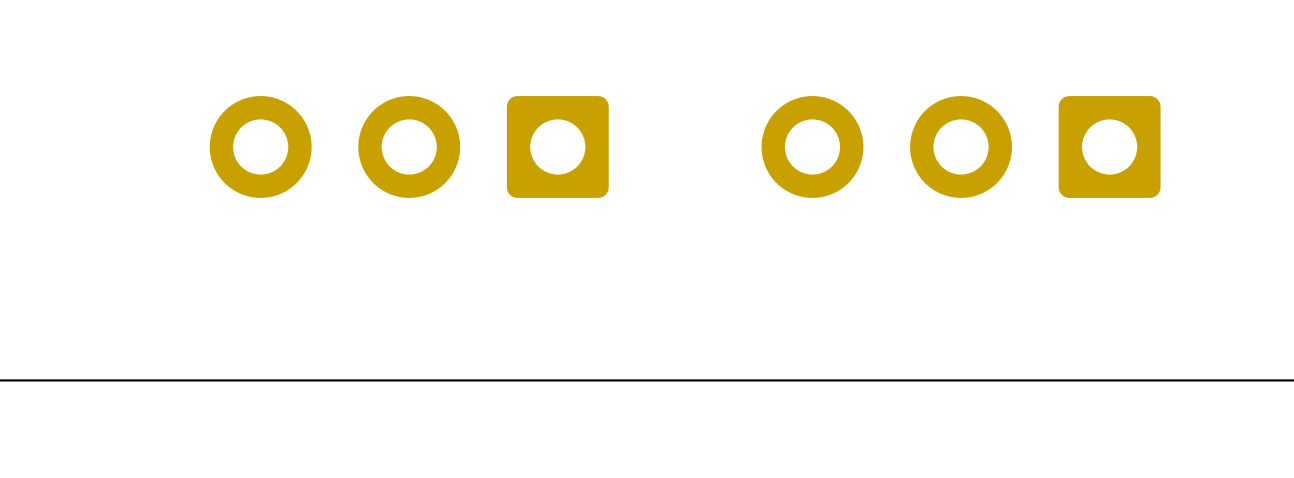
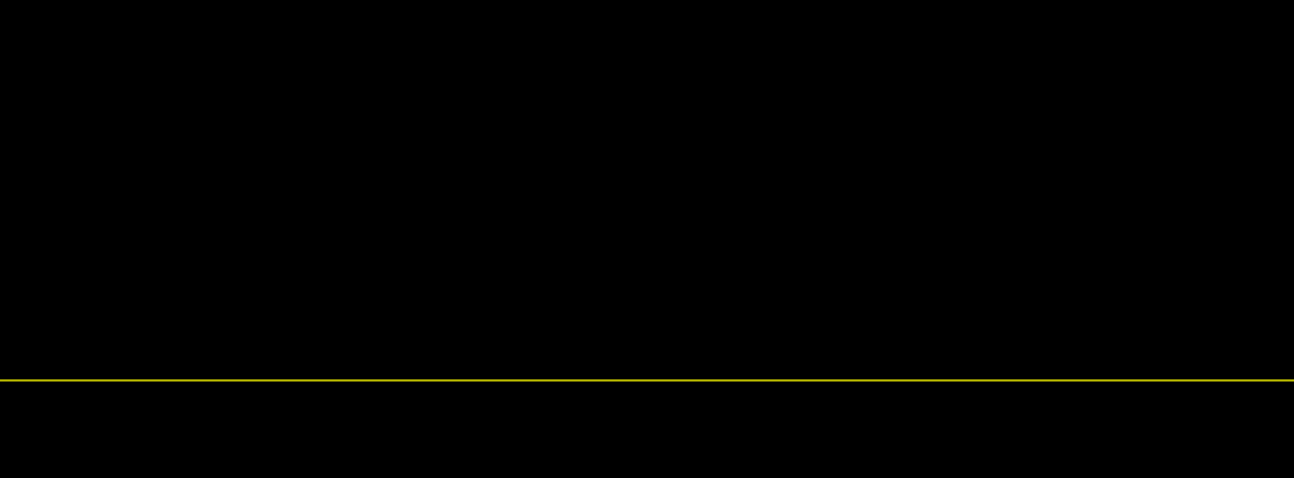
part: (409, 146) -> none
part: (961, 146) -> none

